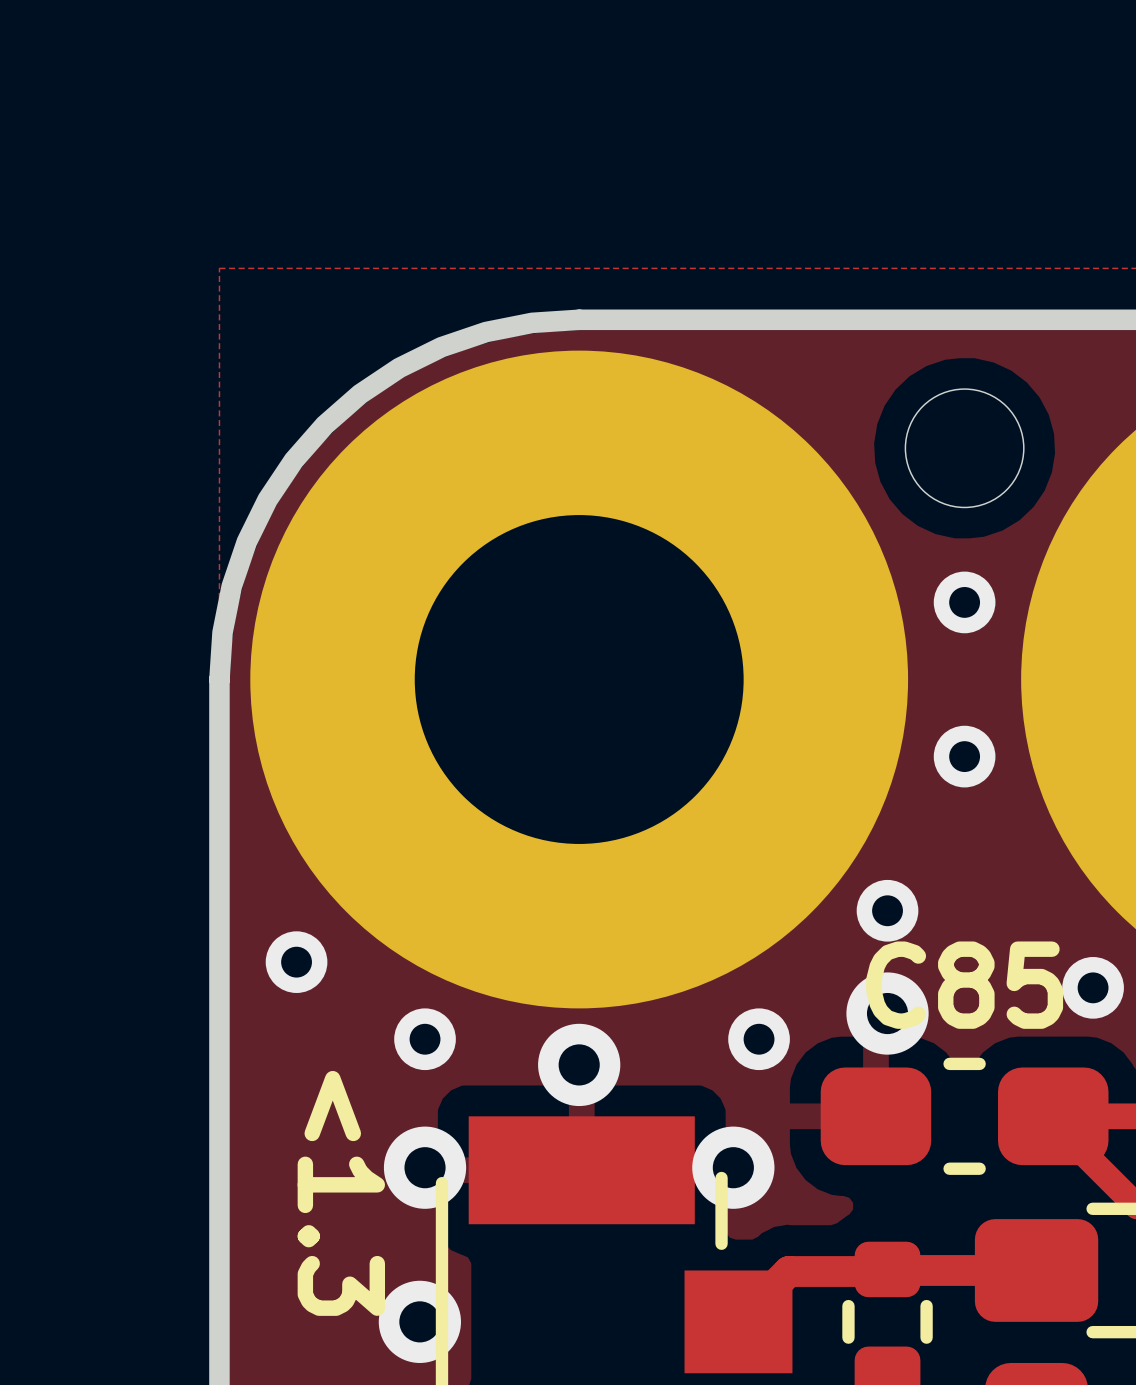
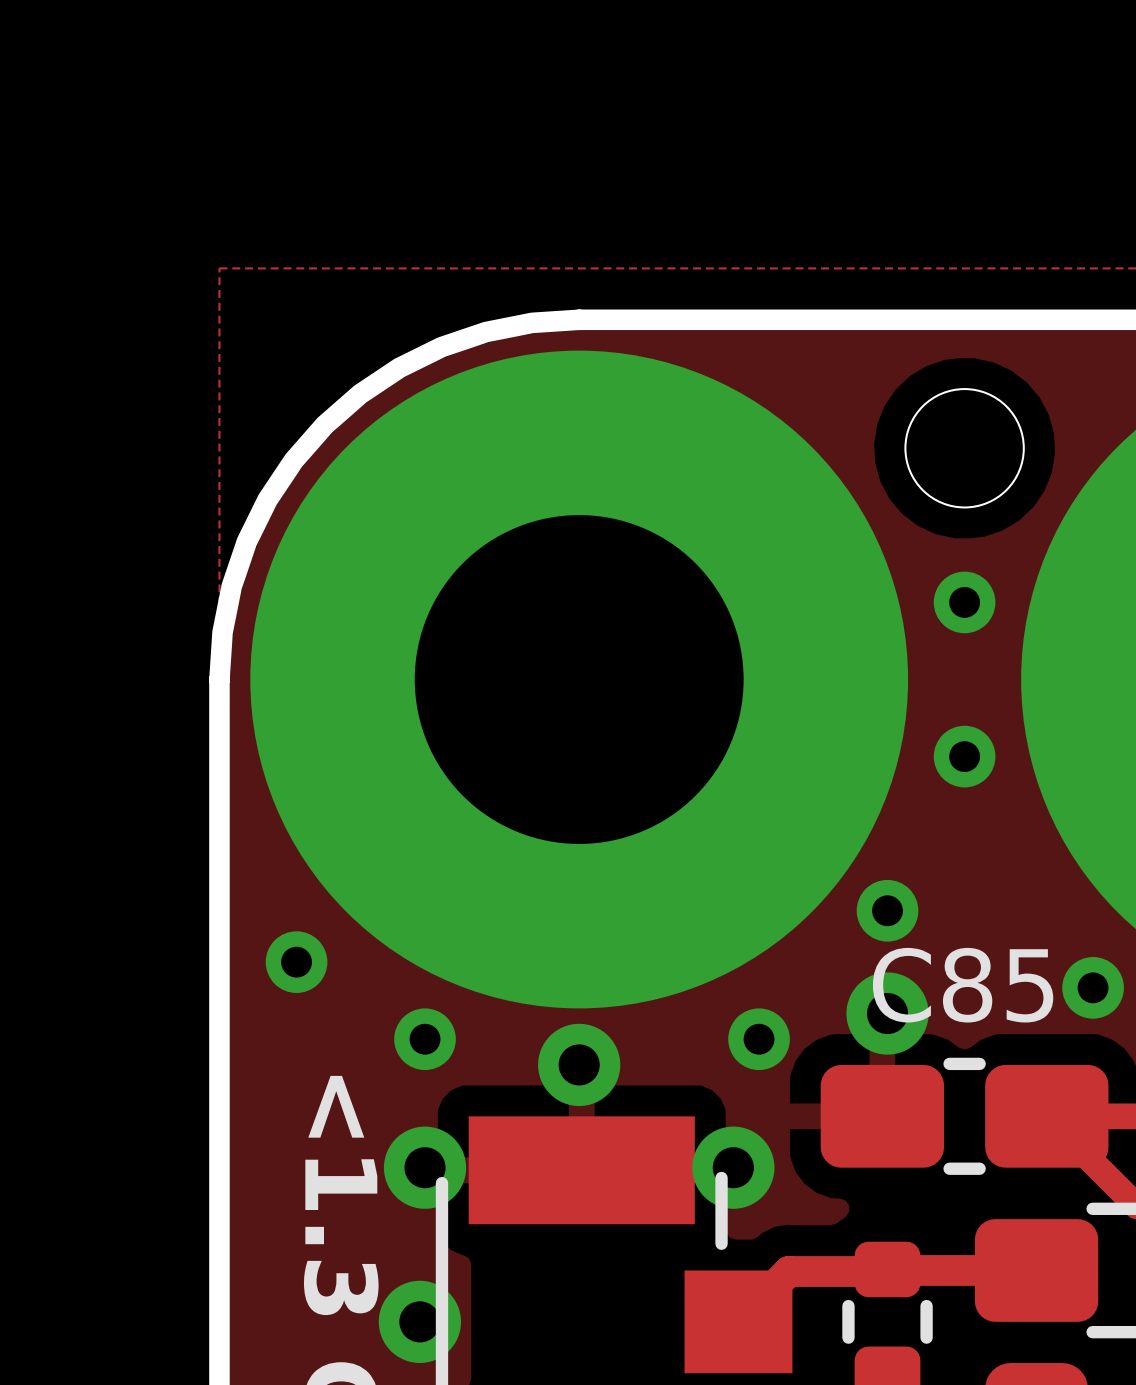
C85 footprint: [820, 1057, 1109, 1175] -> [820, 1057, 1109, 1175]

